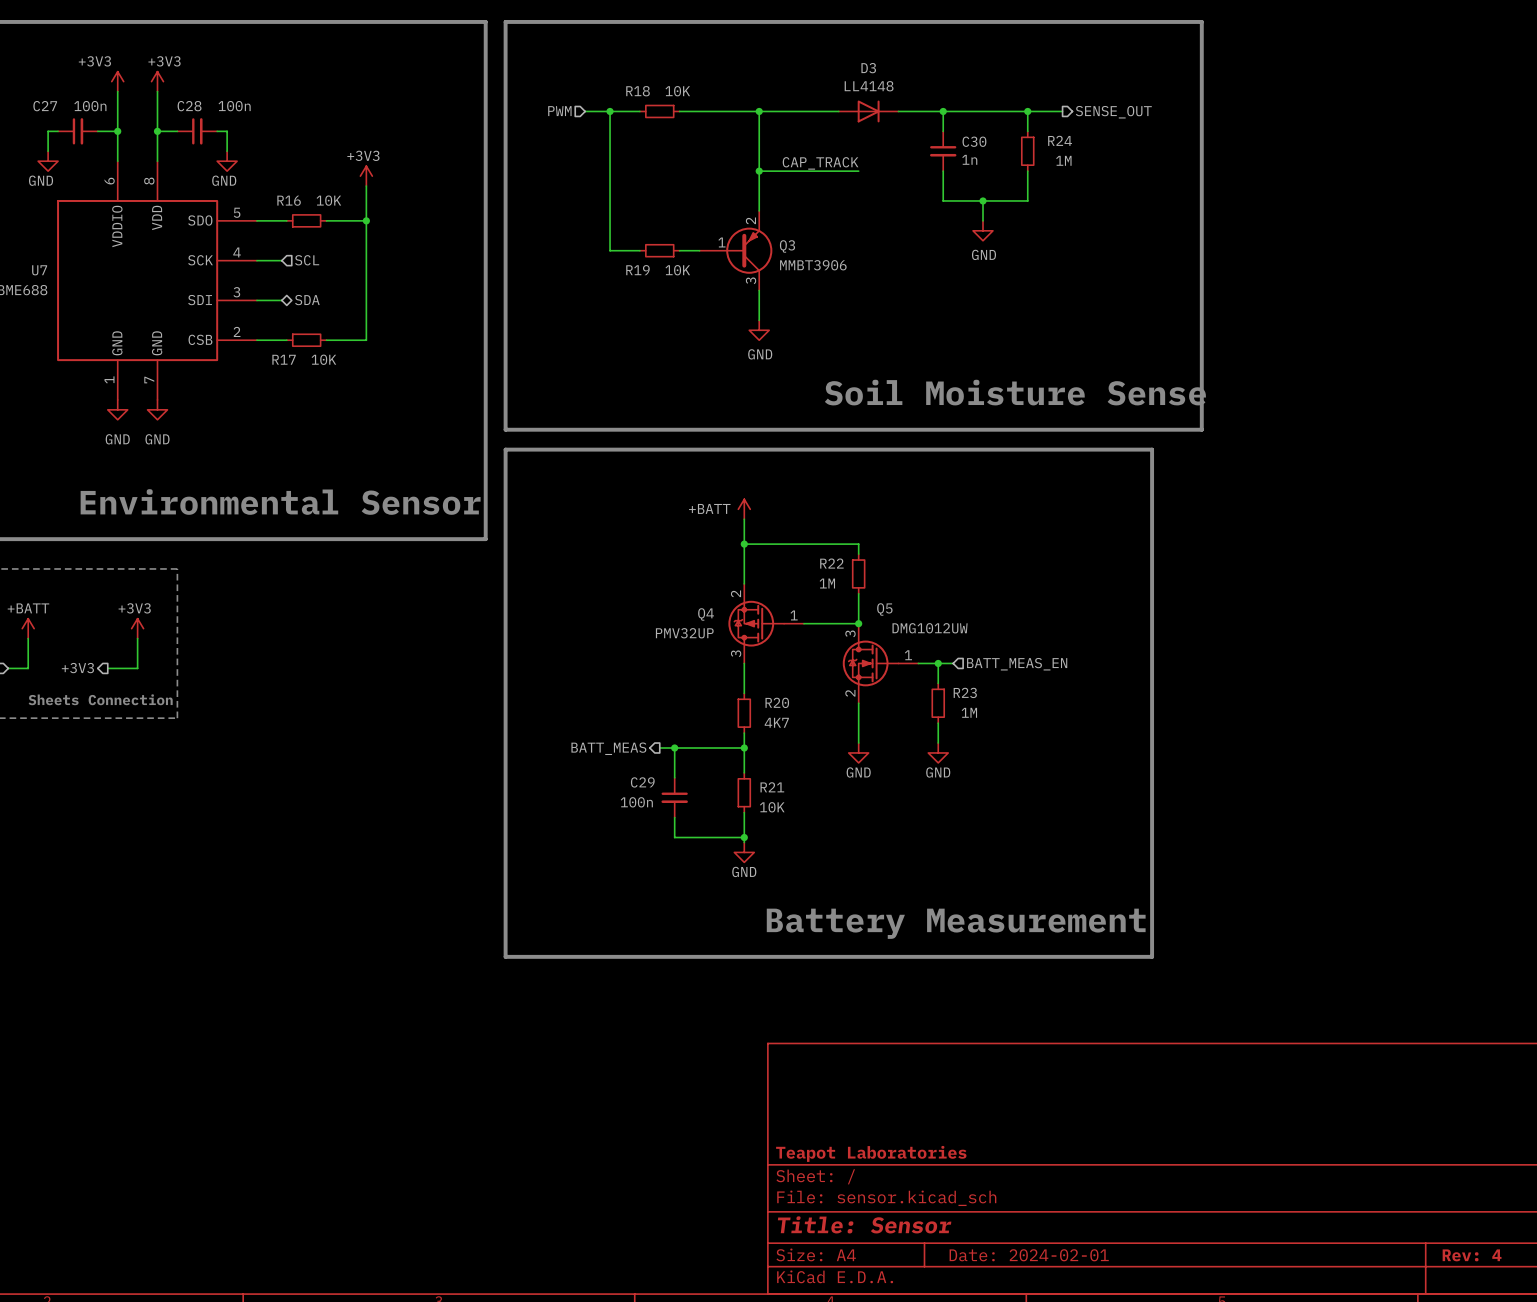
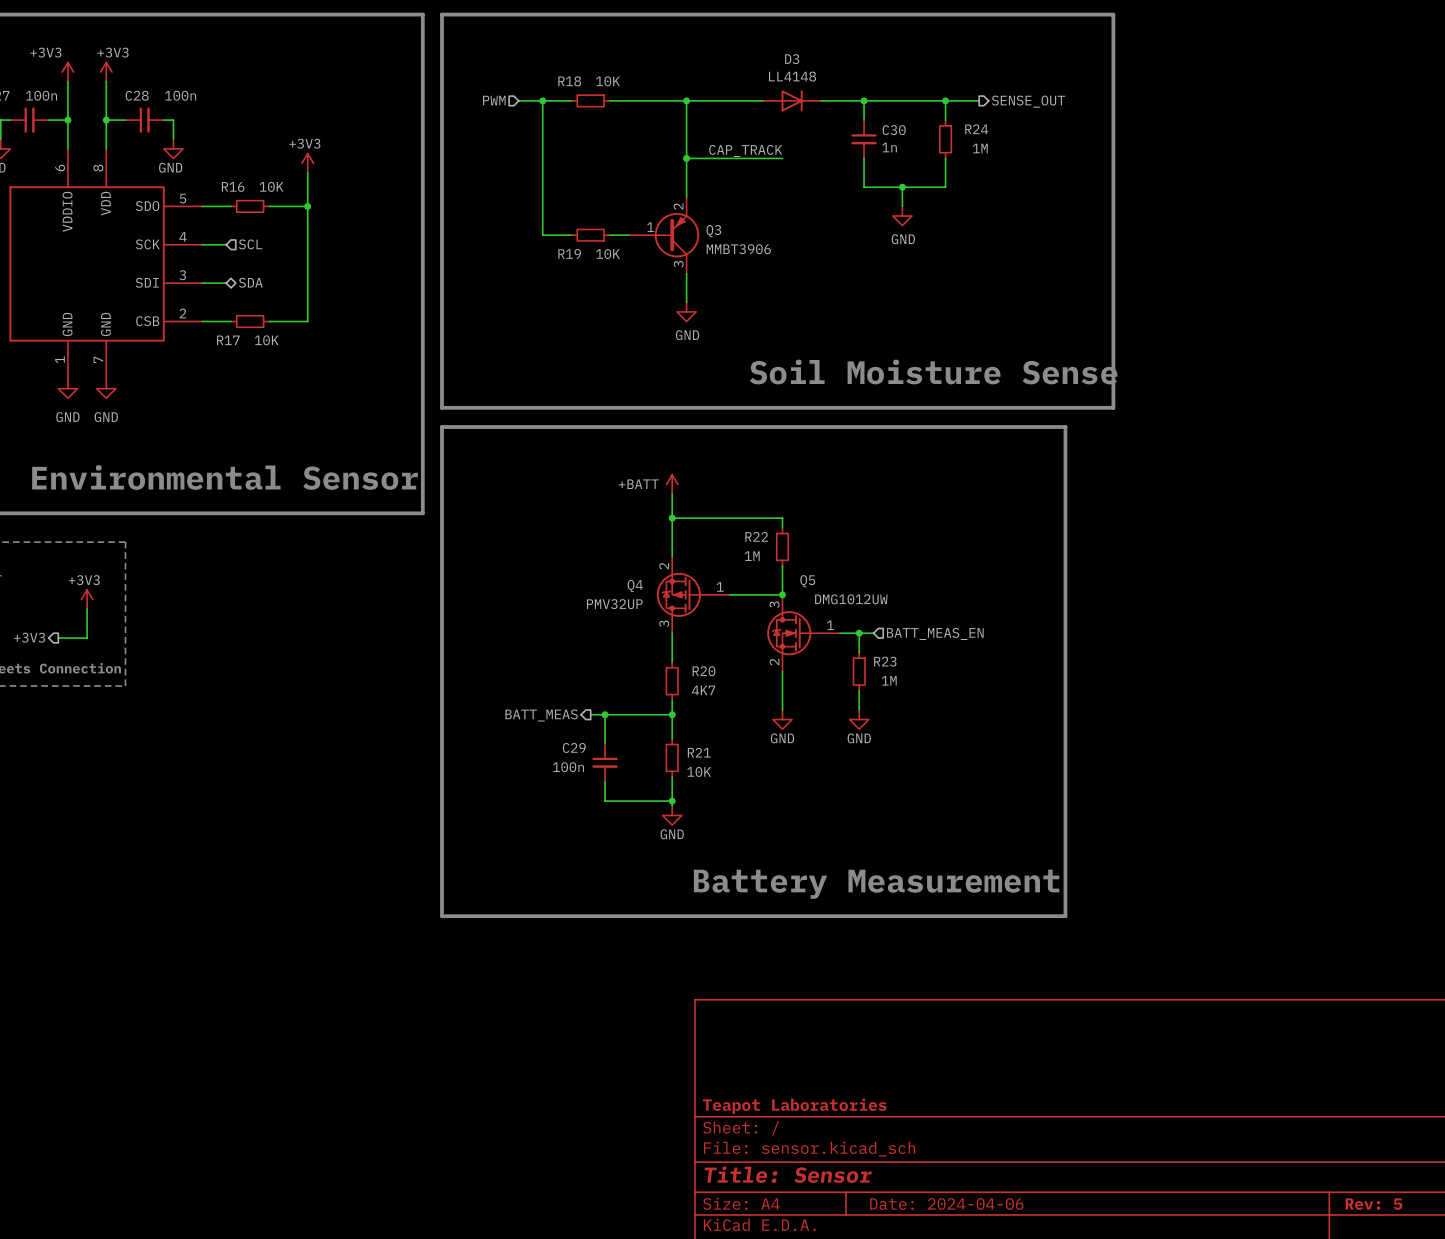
title block: Date: 2024-02-01 (1029, 1255) -> Date: 2024-04-06 (946, 1203)
title block: Rev: 4 (1472, 1255) -> Rev: 5 (1374, 1204)

